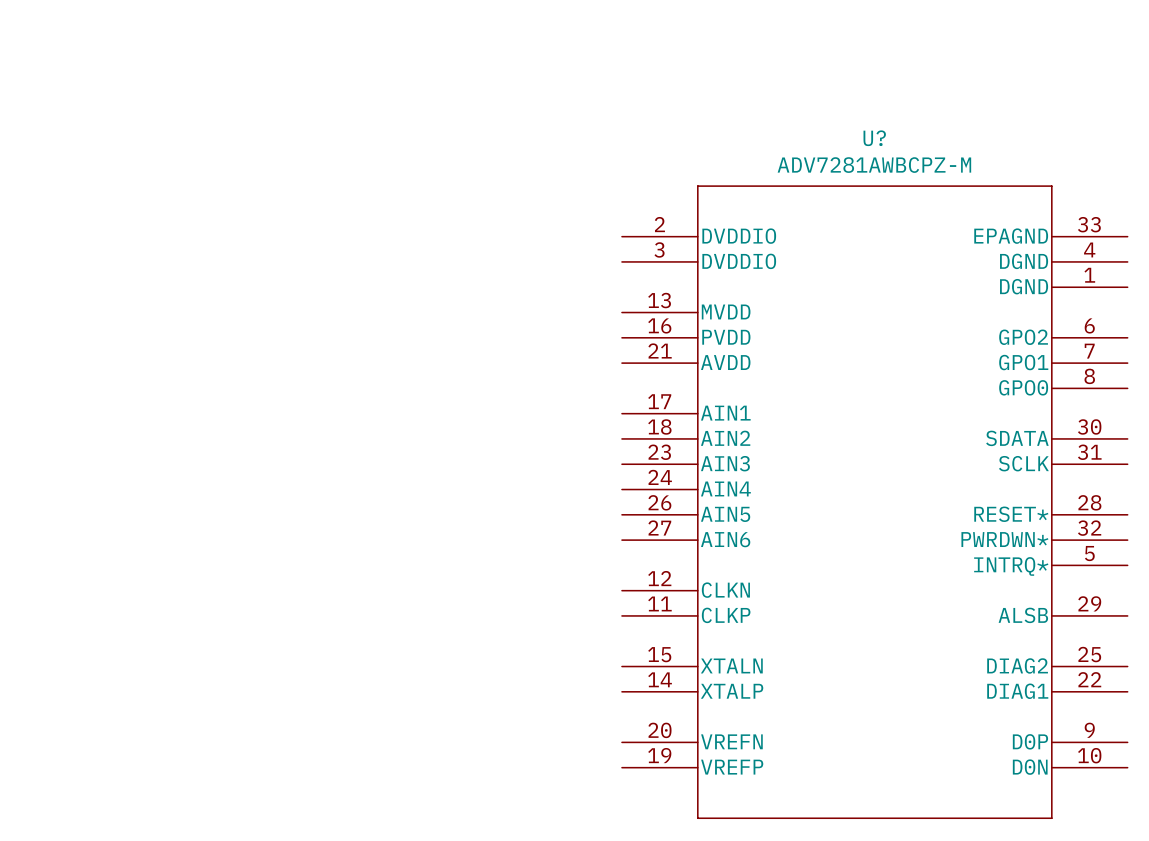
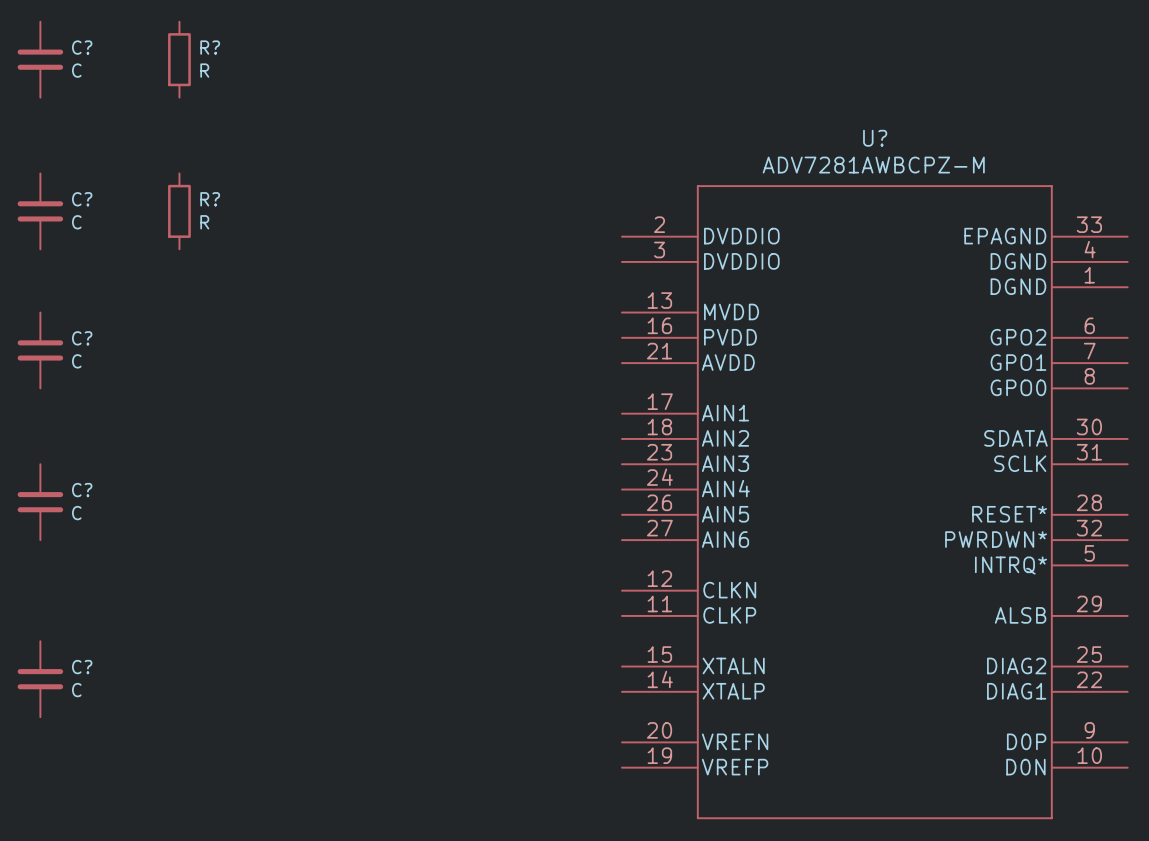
C?: none -> C (40, 59)
R?: none -> R (179, 59)
C?: none -> C (40, 211)
R?: none -> R (179, 211)
C?: none -> C (40, 350)
C?: none -> C (40, 502)
C?: none -> C (40, 679)

